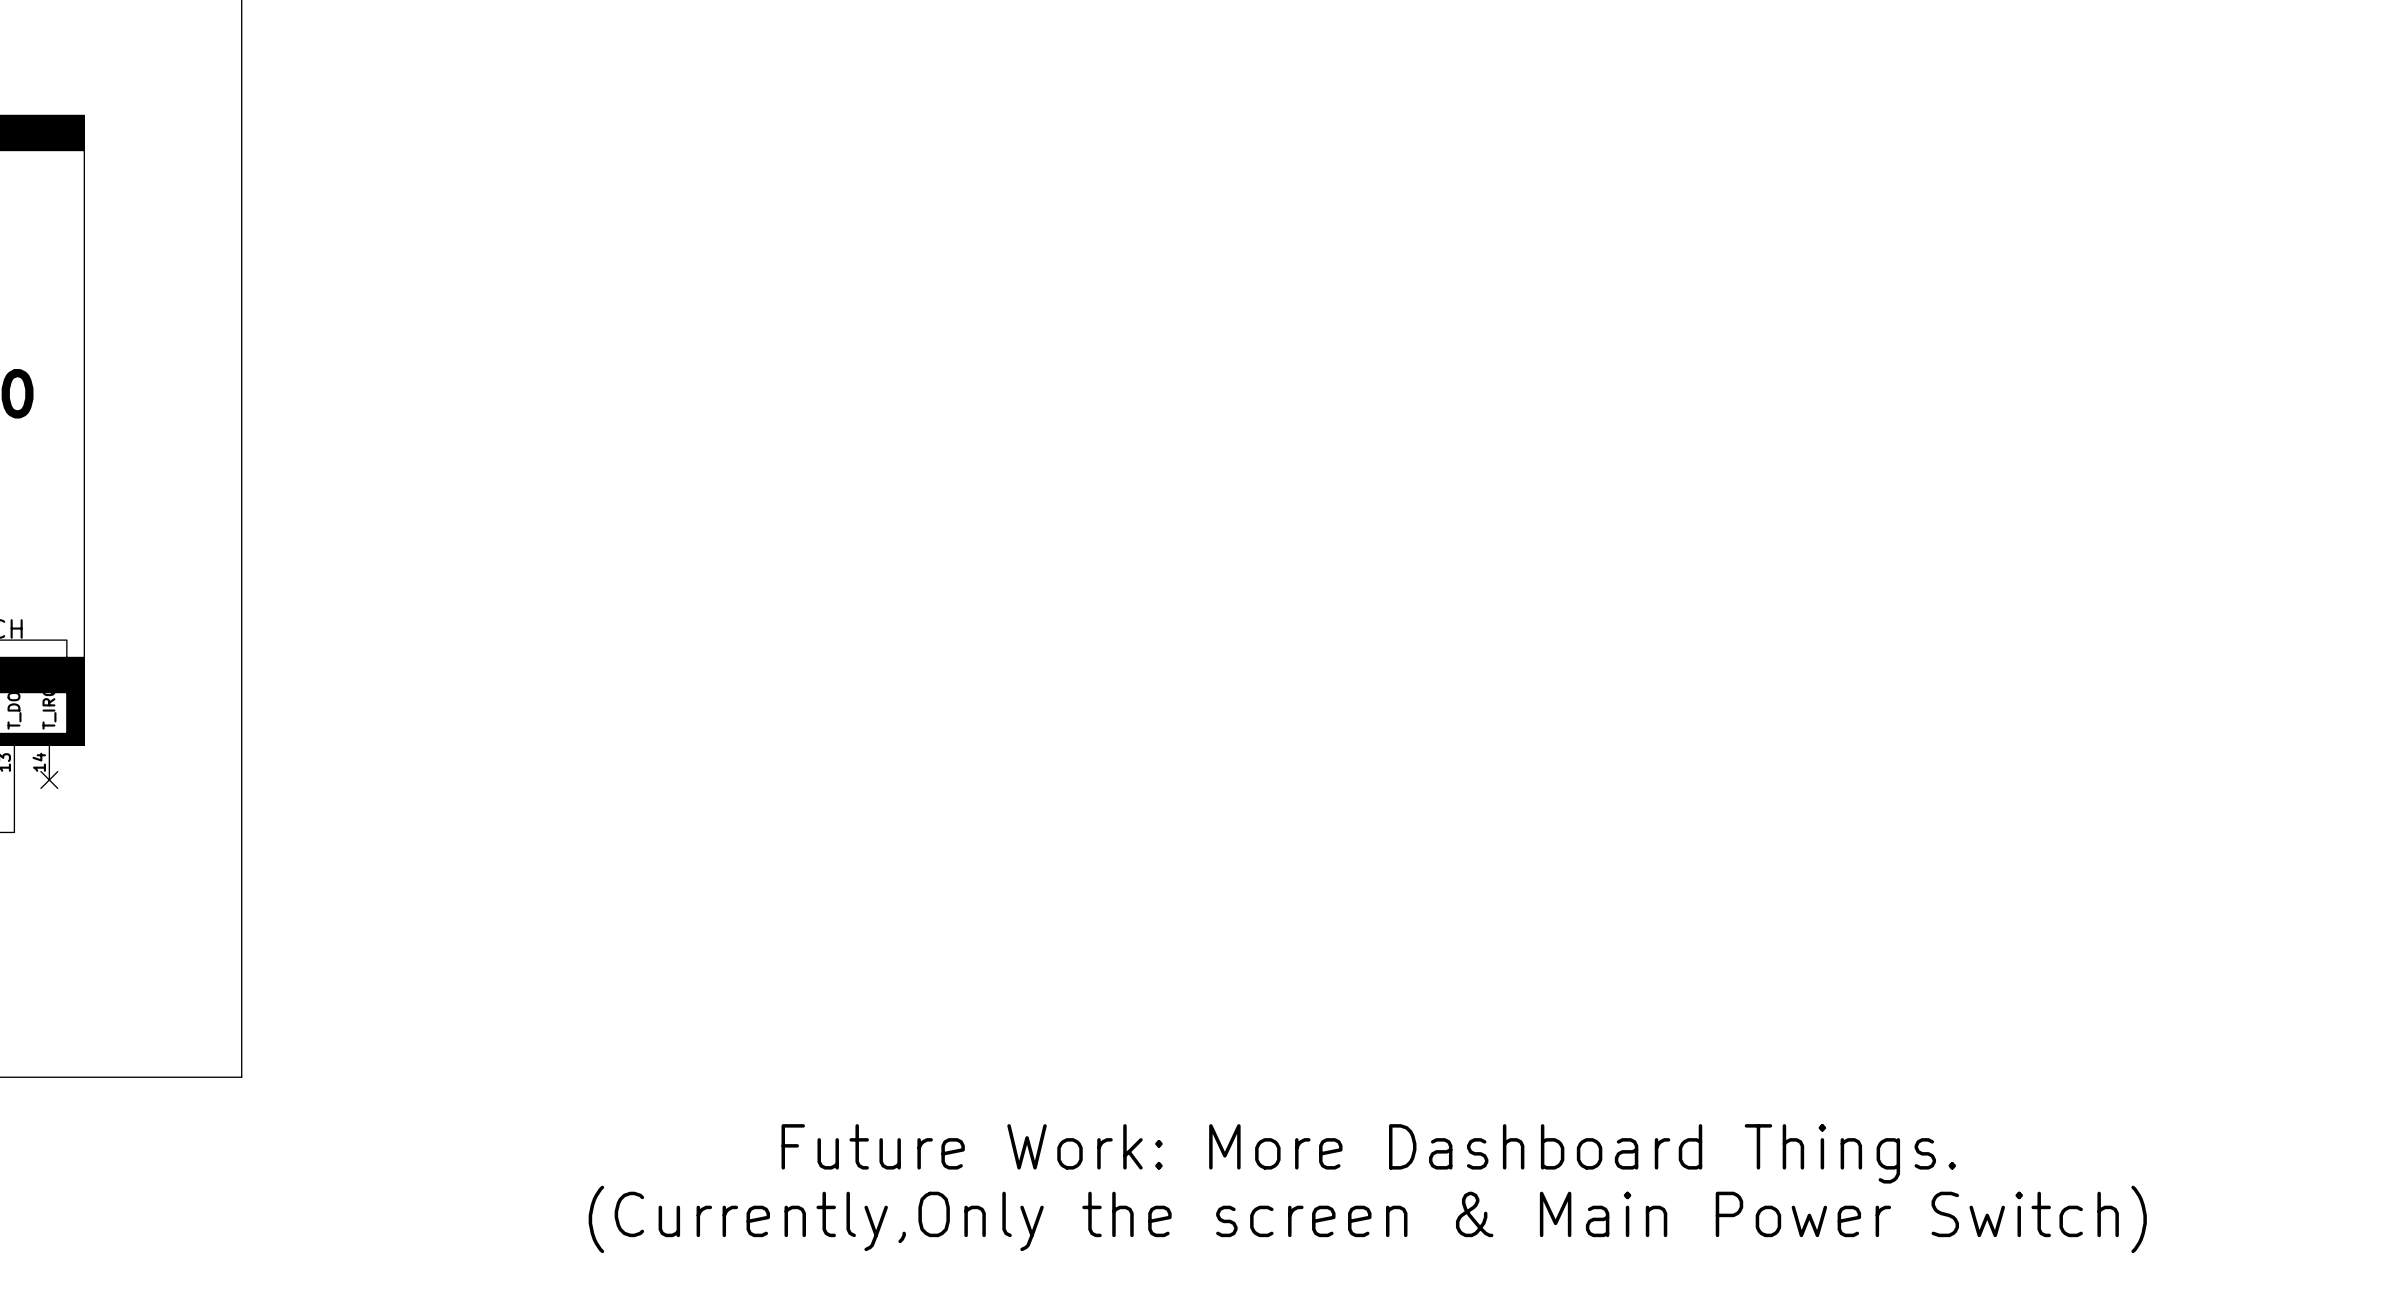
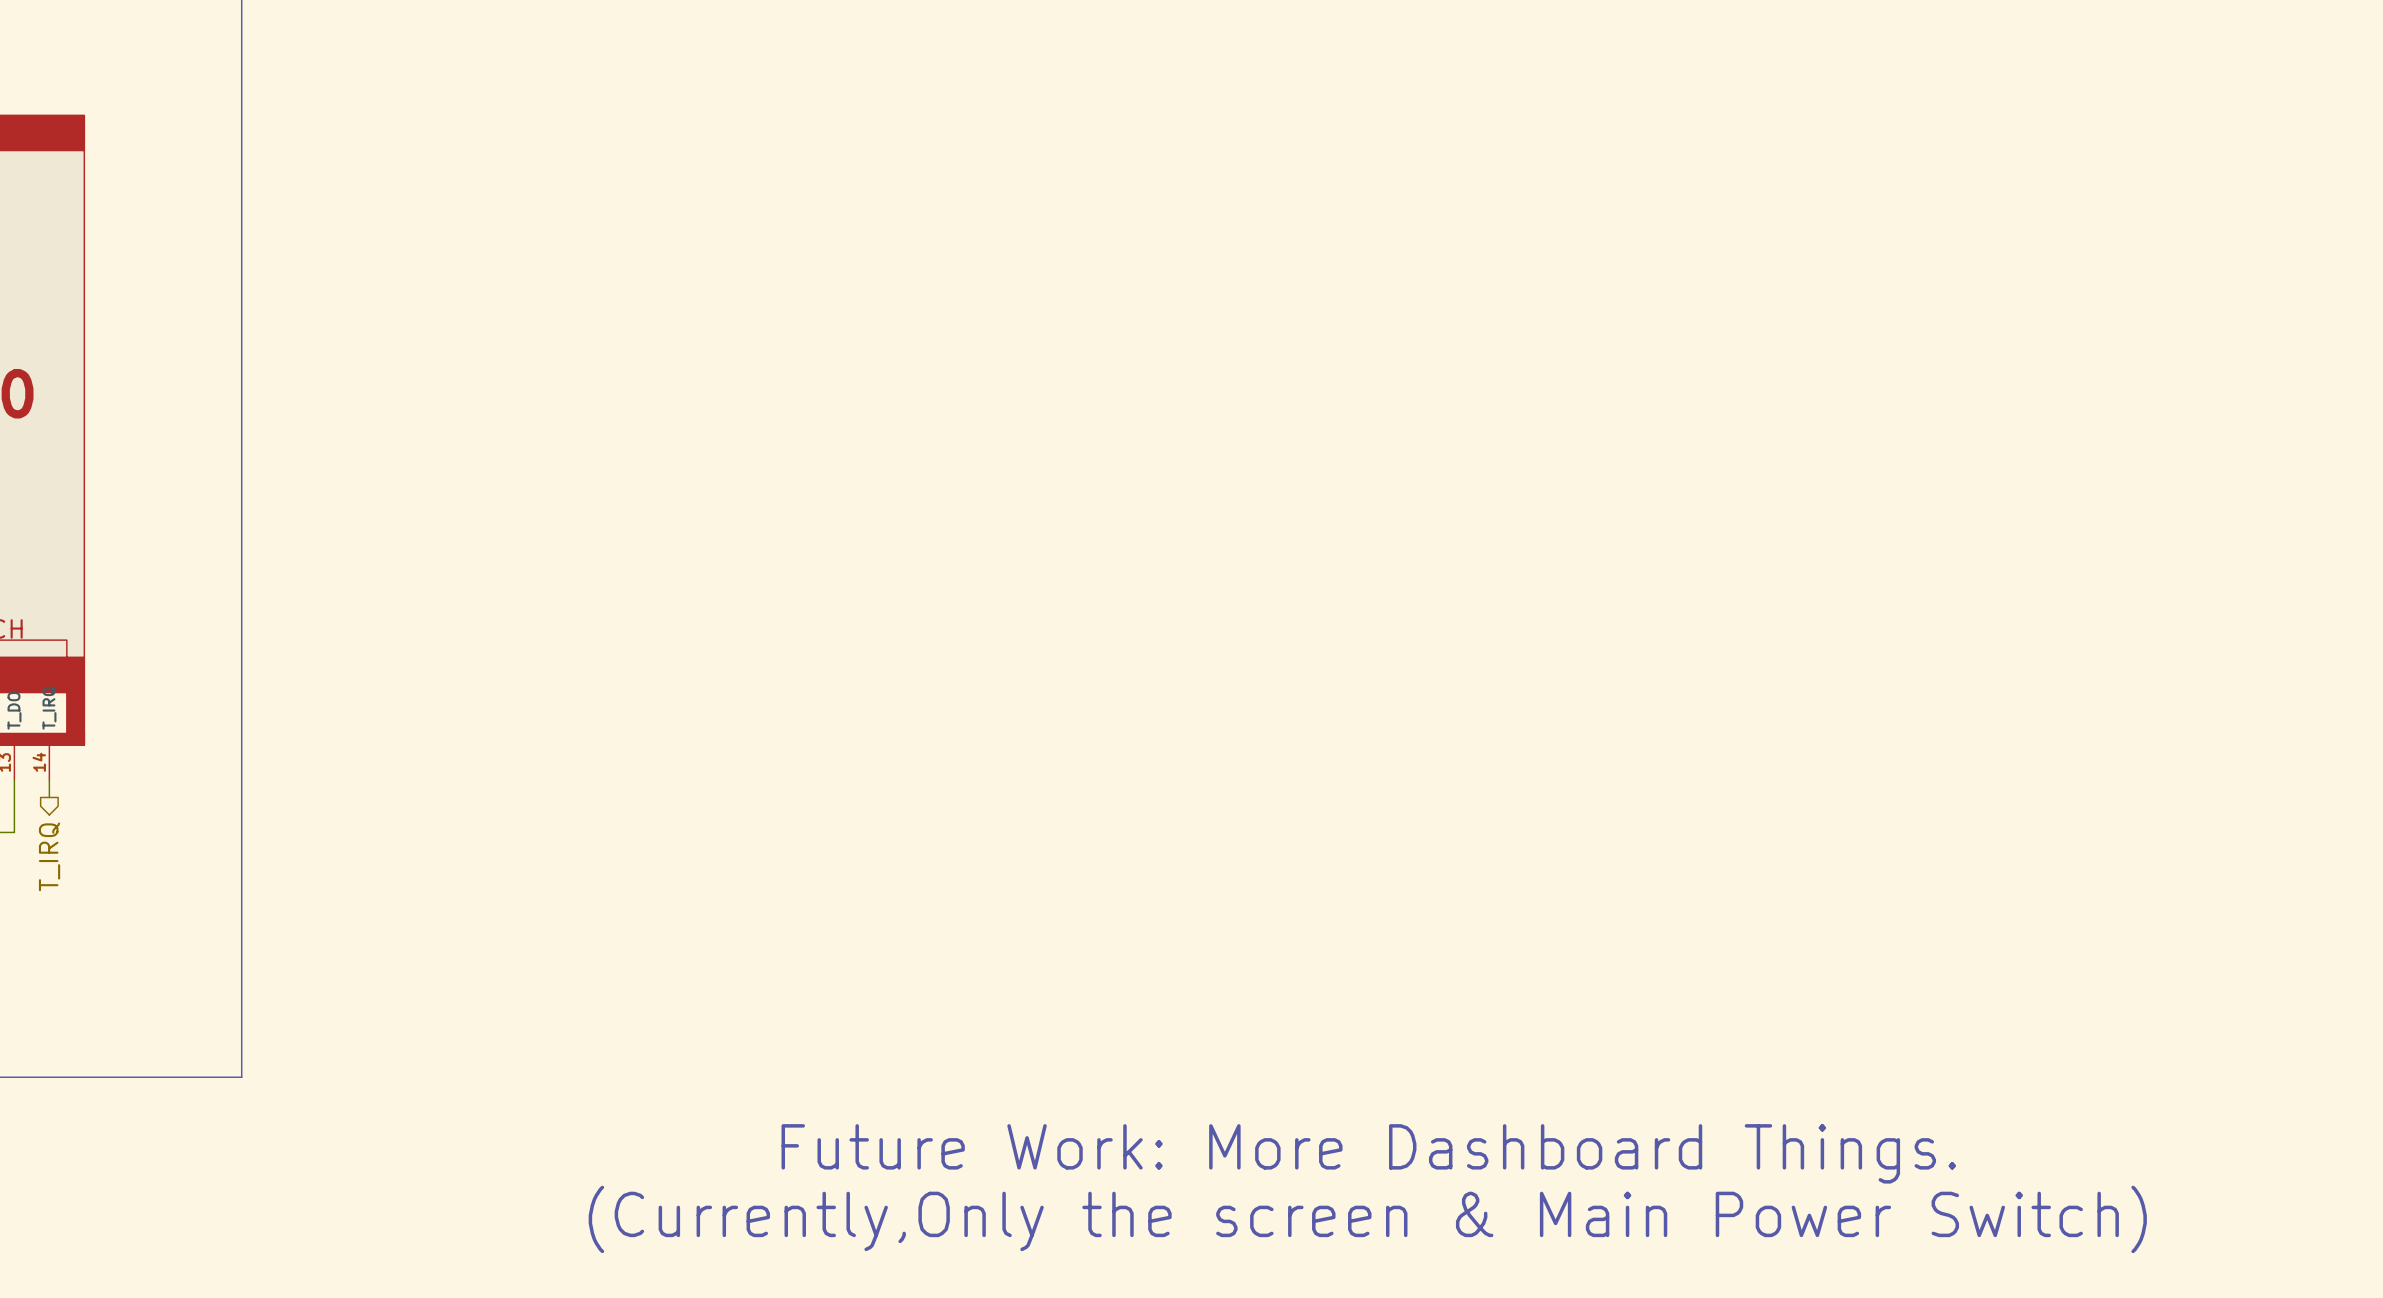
wire: none -> (49, 779) (49, 797)
no-connect mark: (49, 779) -> none
hierarchical label: none -> T_IRQ (49, 856)

